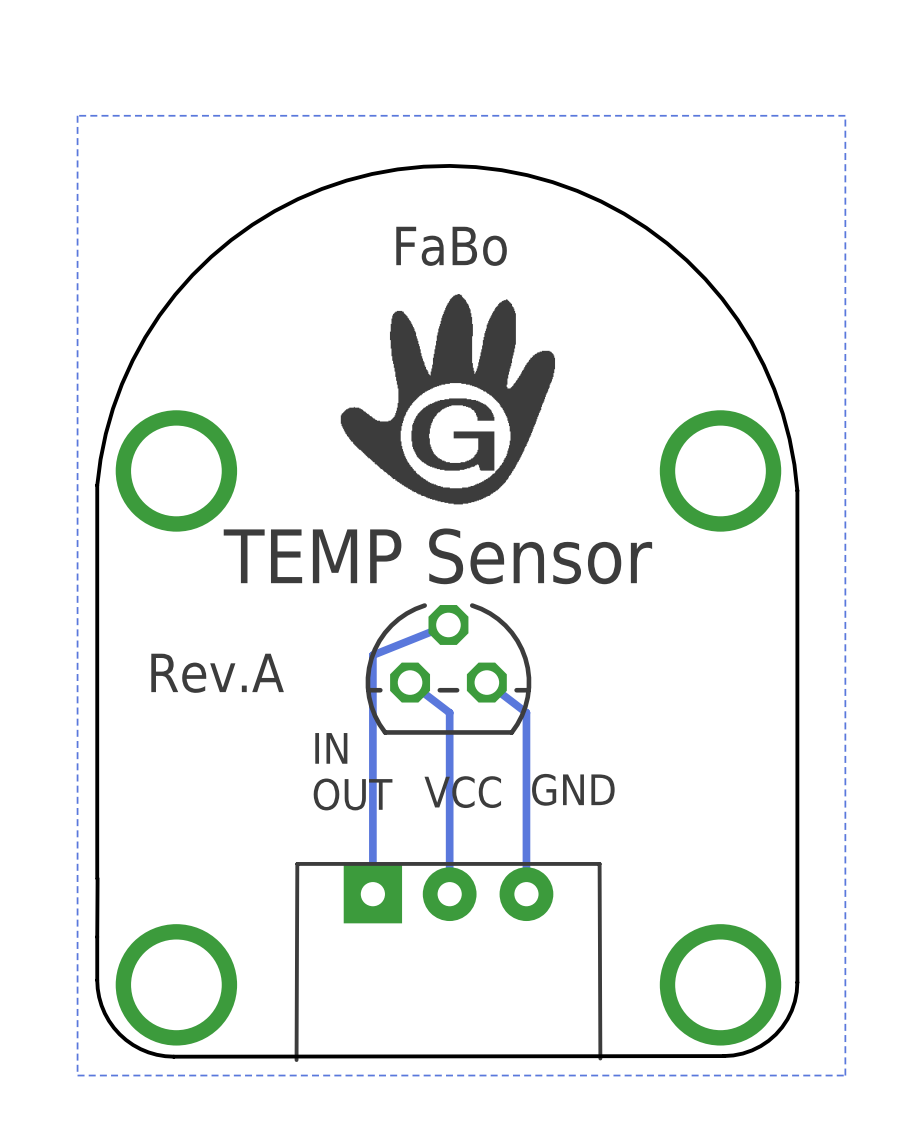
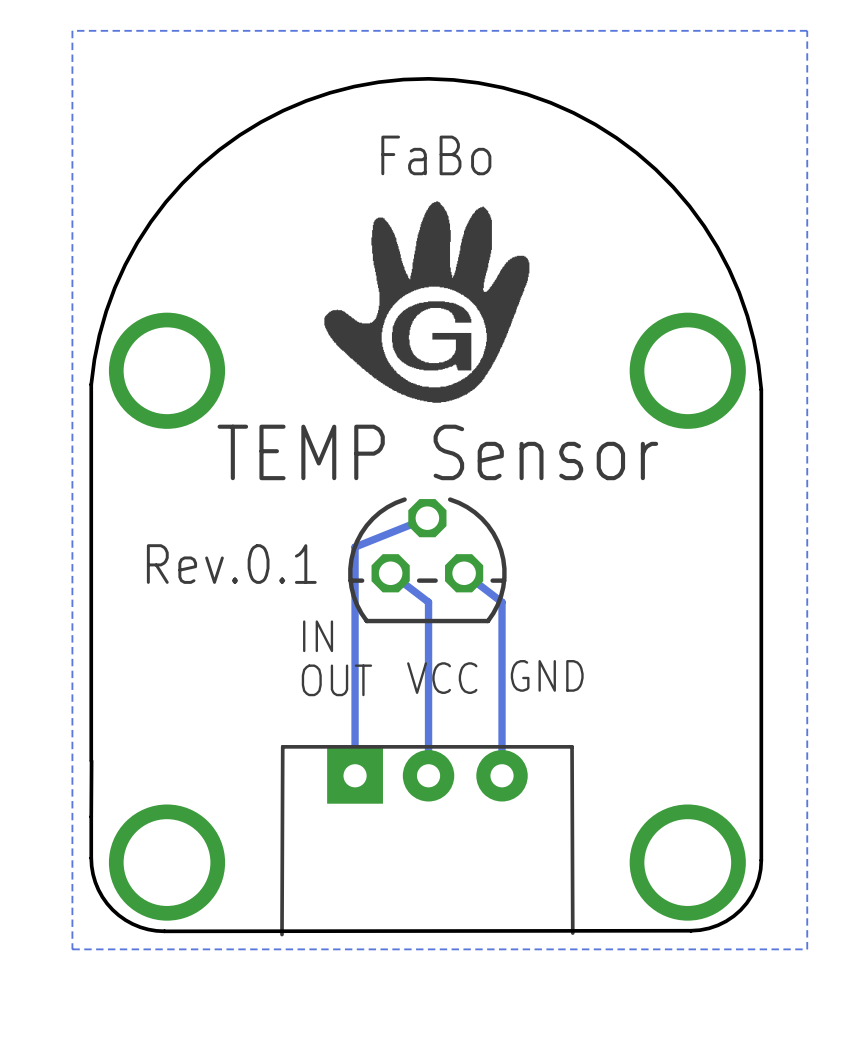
text: Rev.A (217, 673) -> Rev.0.1 (231, 564)

